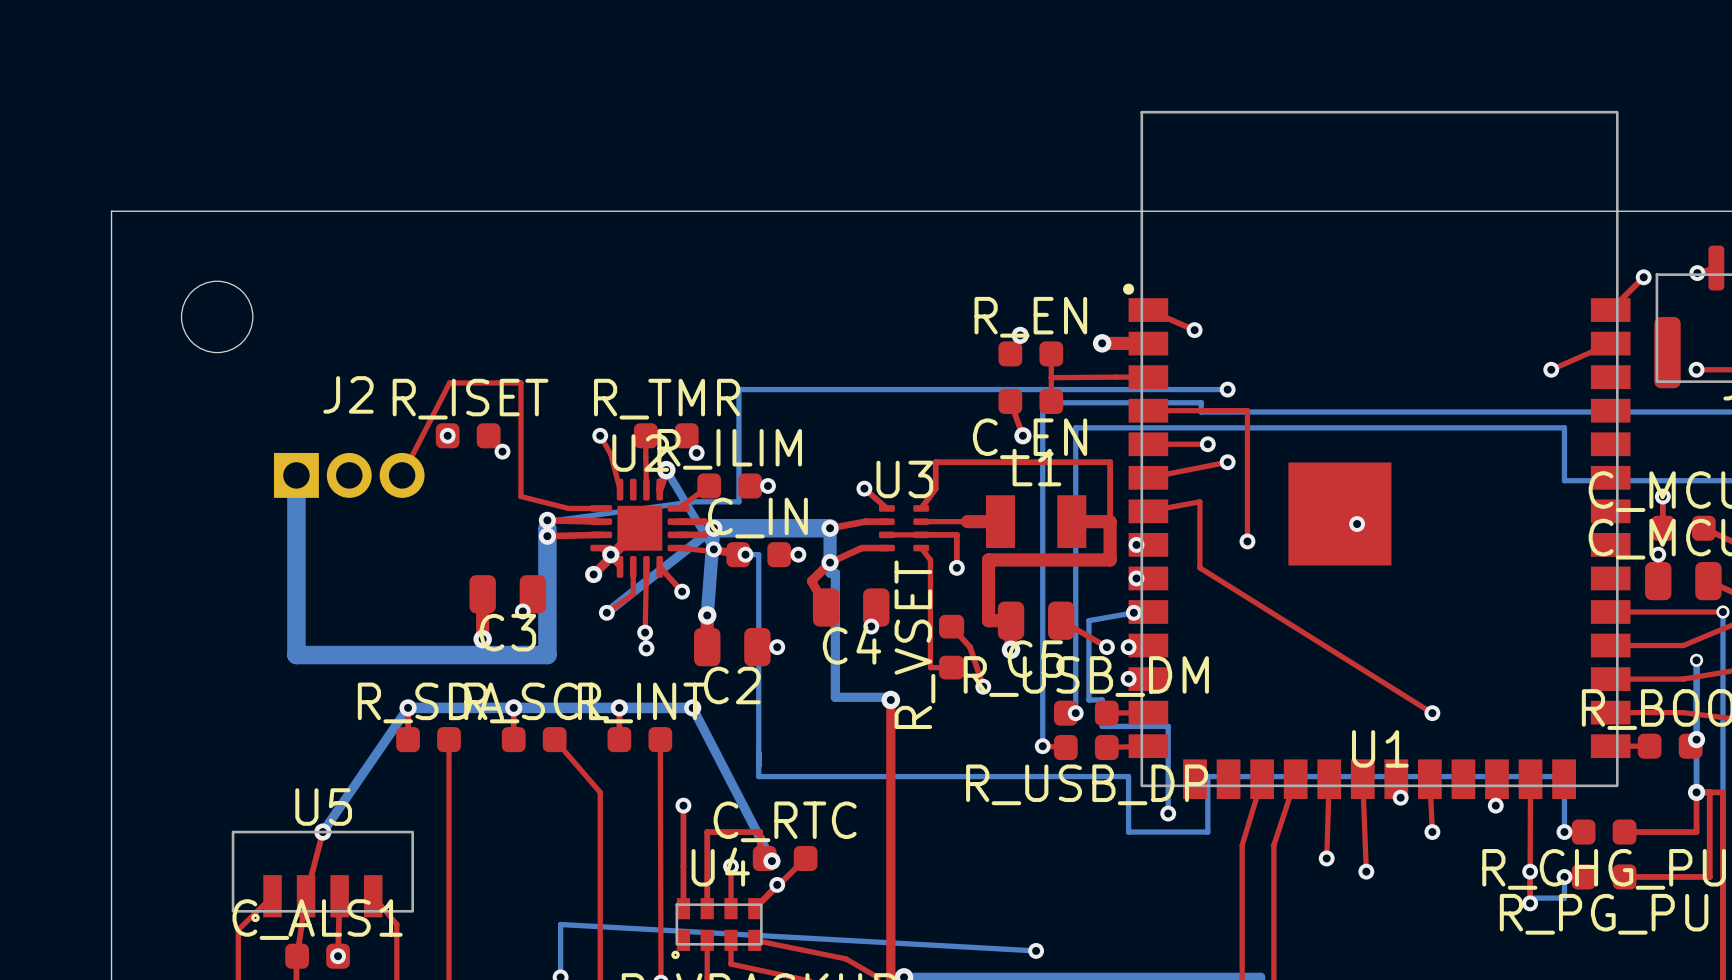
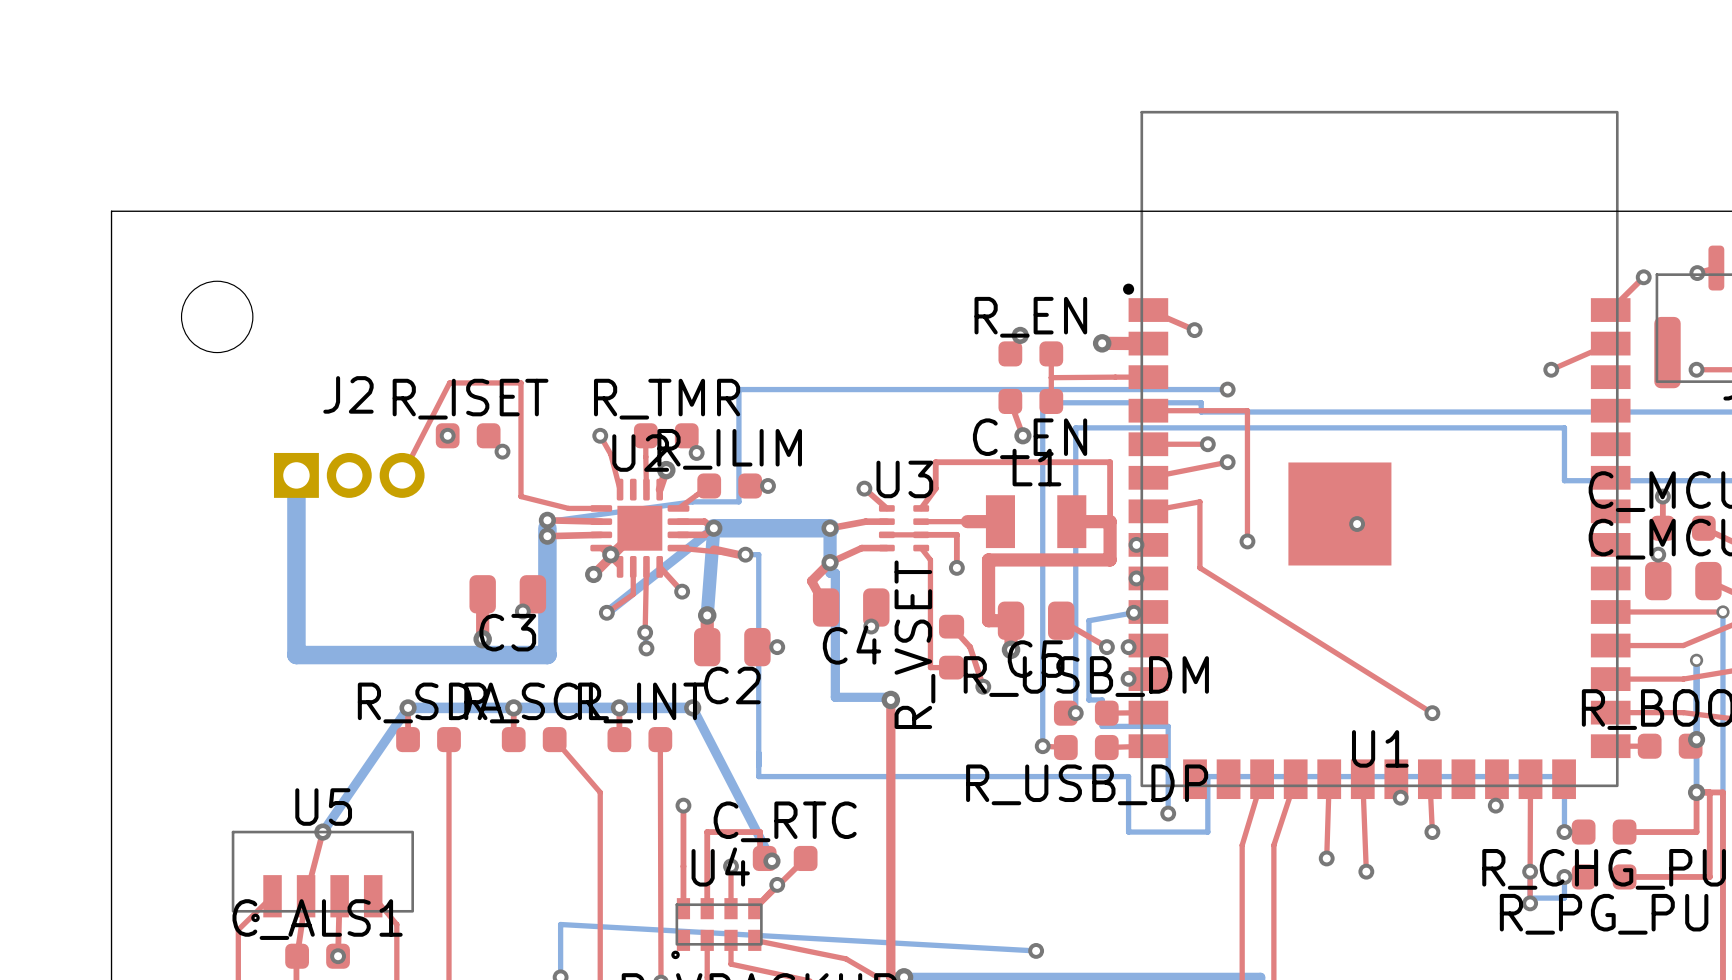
bottom track: (666, 470) (713, 549) -> none
via: (713, 549) -> none
C_IN: (758, 554) -> none
via: (798, 554) -> none

